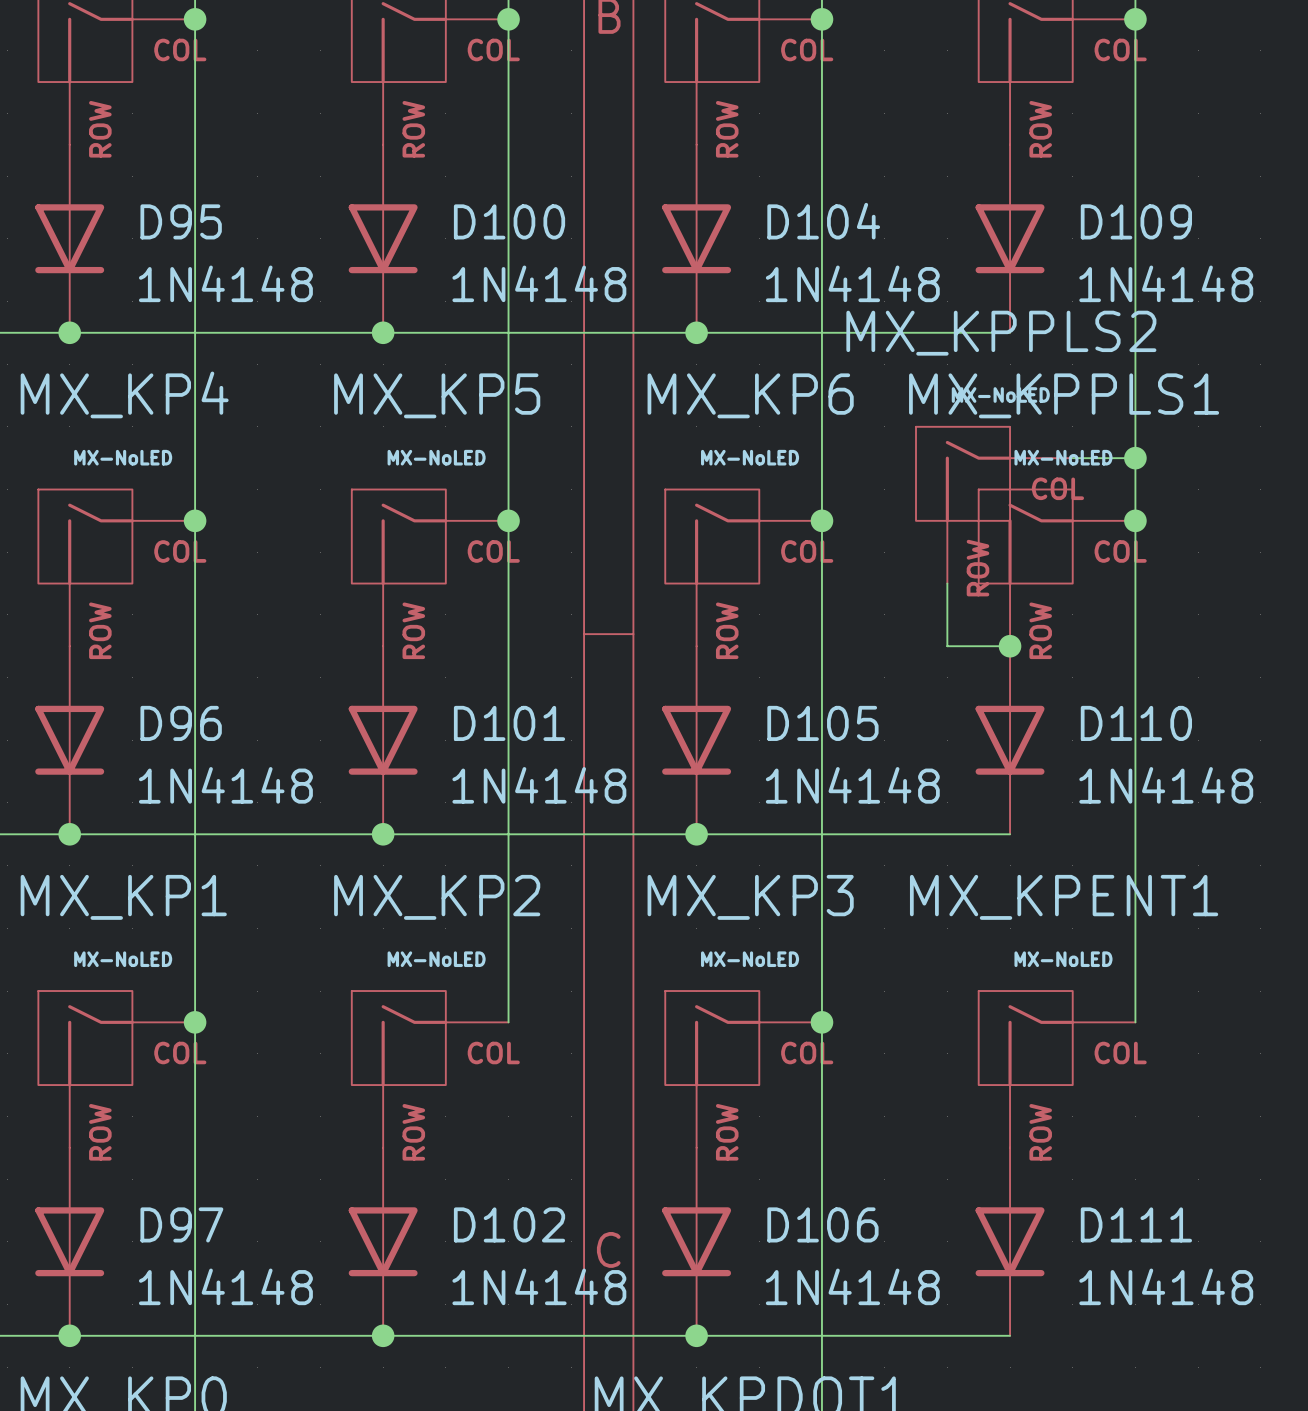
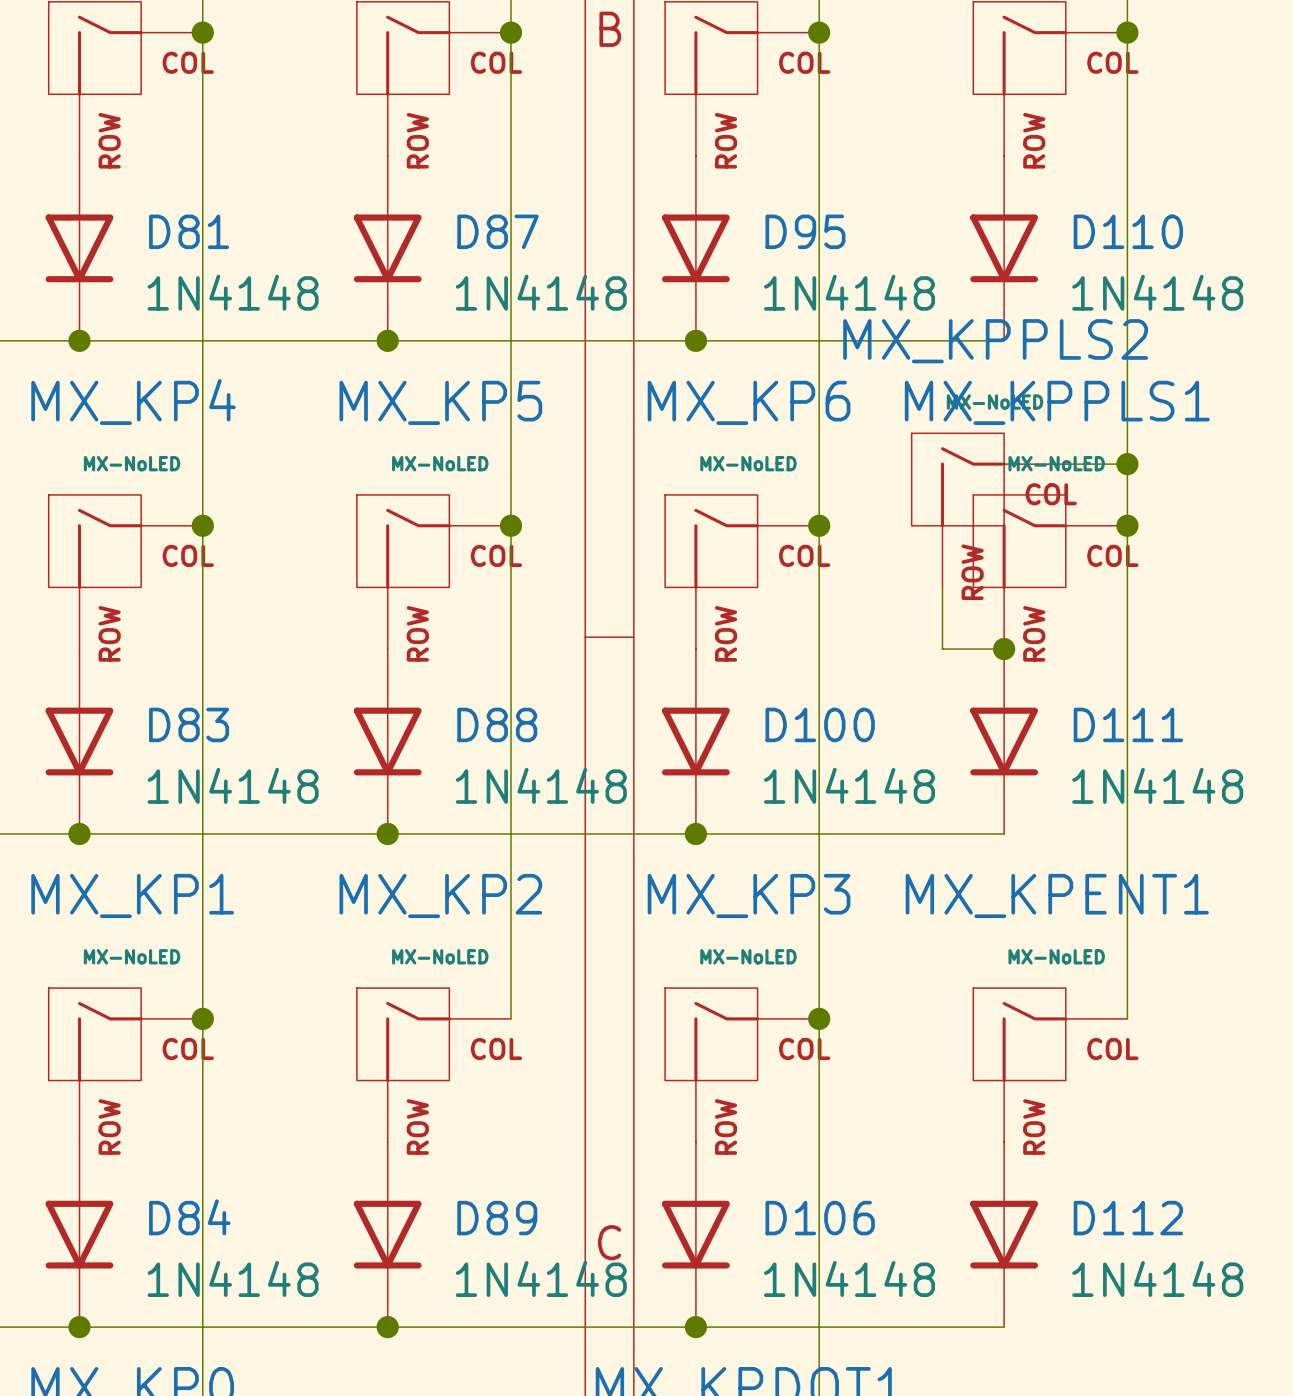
D95 name: D95 (181, 221) -> D81 (189, 231)
D100 name: D100 (509, 221) -> D87 (498, 231)
D104 name: D104 (823, 221) -> D95 (805, 231)
D109 name: D109 (1136, 221) -> D110 (1128, 231)
D96 name: D96 (181, 723) -> D83 (189, 724)
D101 name: D101 (509, 723) -> D88 (497, 724)
D105 name: D105 (822, 723) -> D100 (820, 724)
D110 name: D110 (1136, 723) -> D111 (1128, 724)
D97 name: D97 (181, 1224) -> D84 (189, 1217)
D102 name: D102 (509, 1224) -> D89 (497, 1218)
D111 name: D111 (1136, 1224) -> D112 (1128, 1218)

